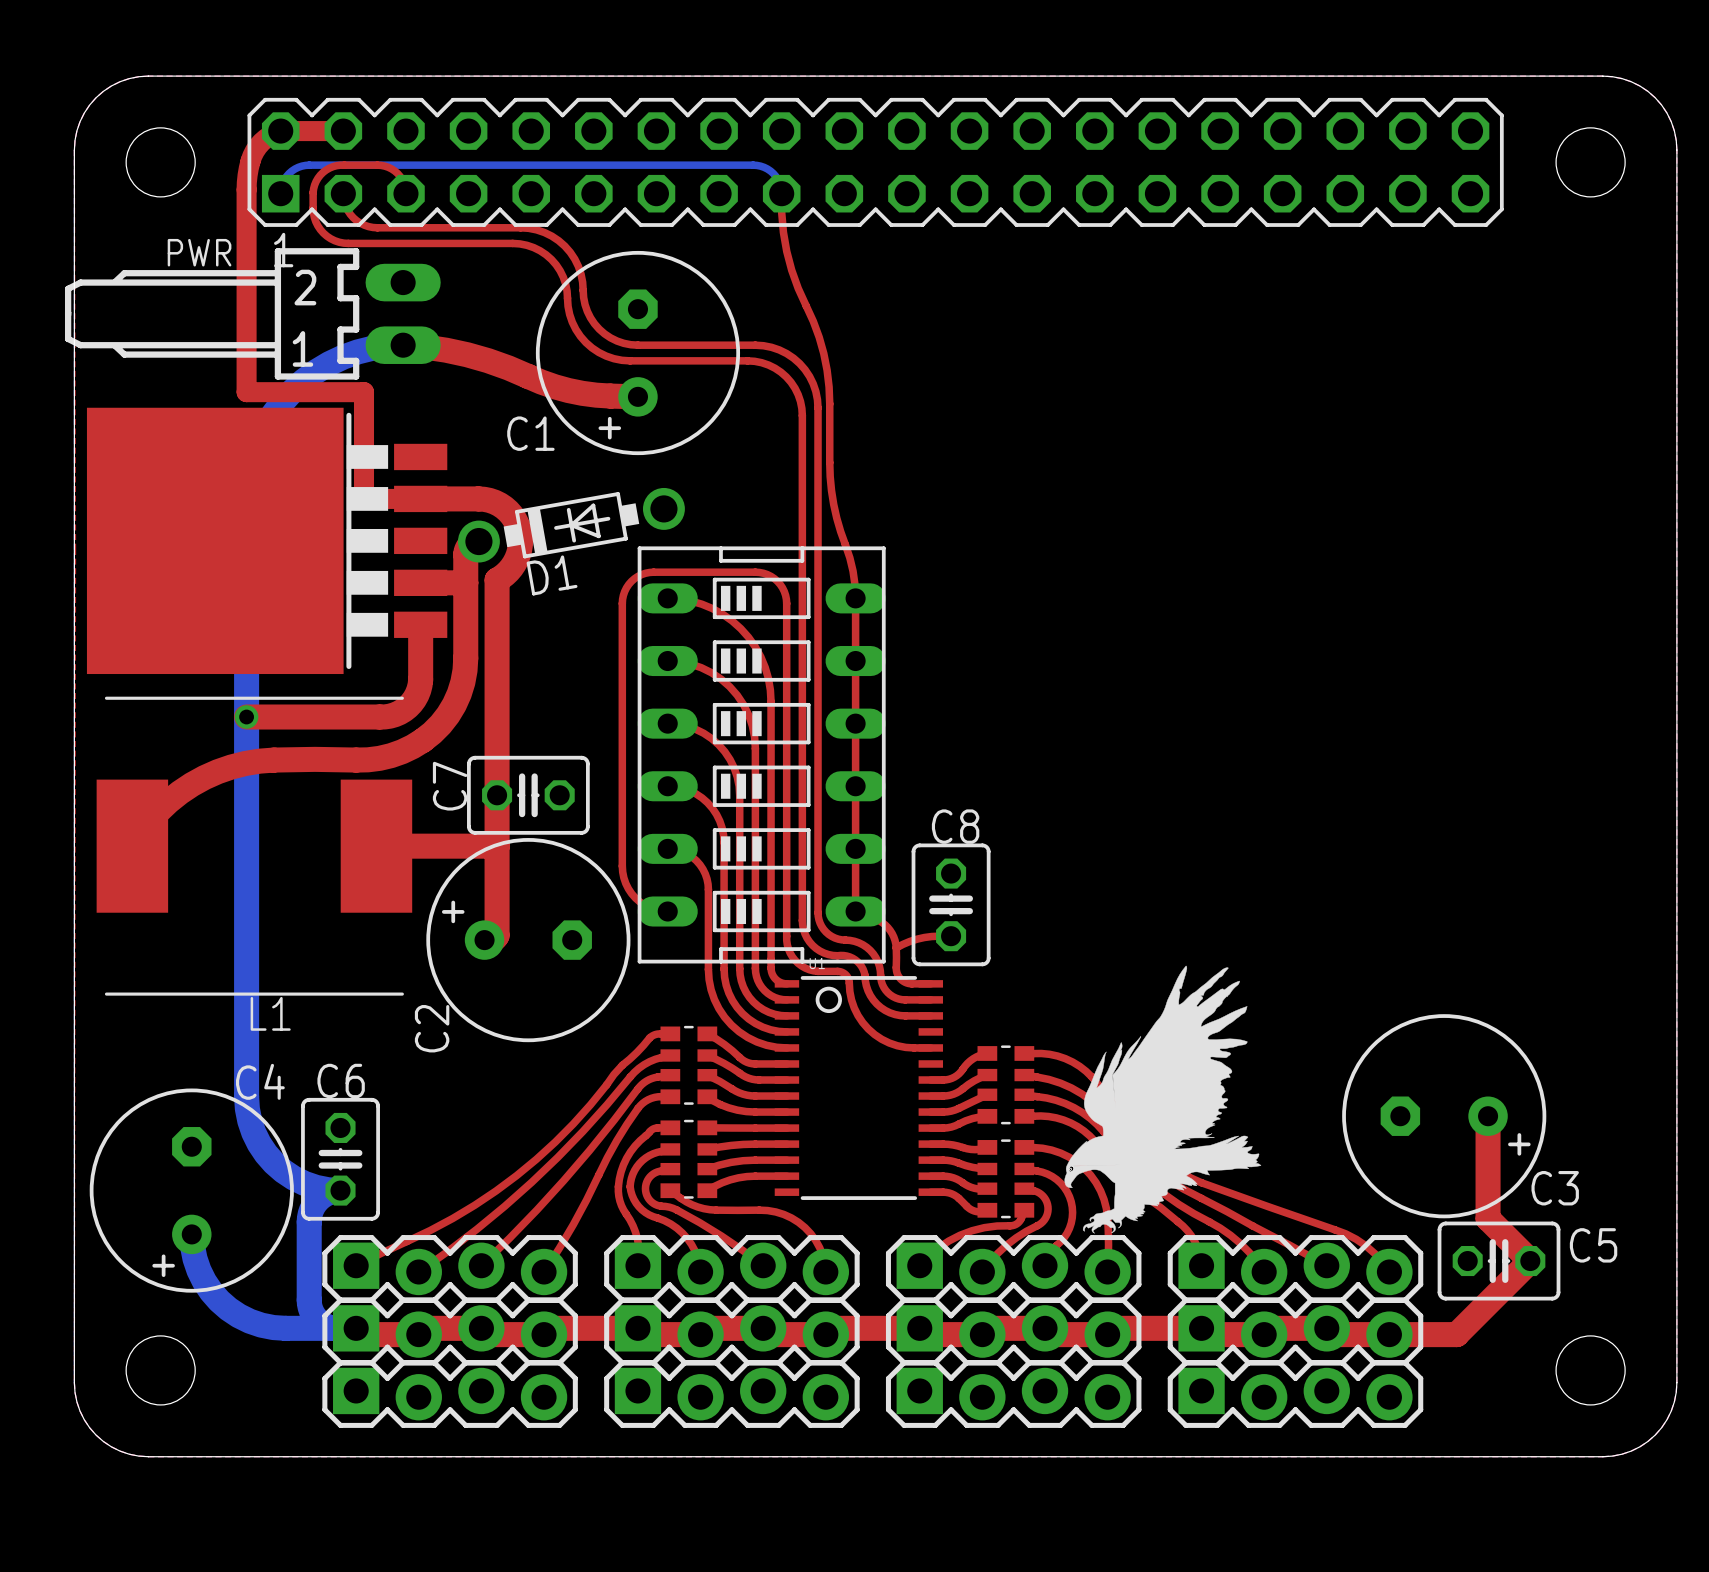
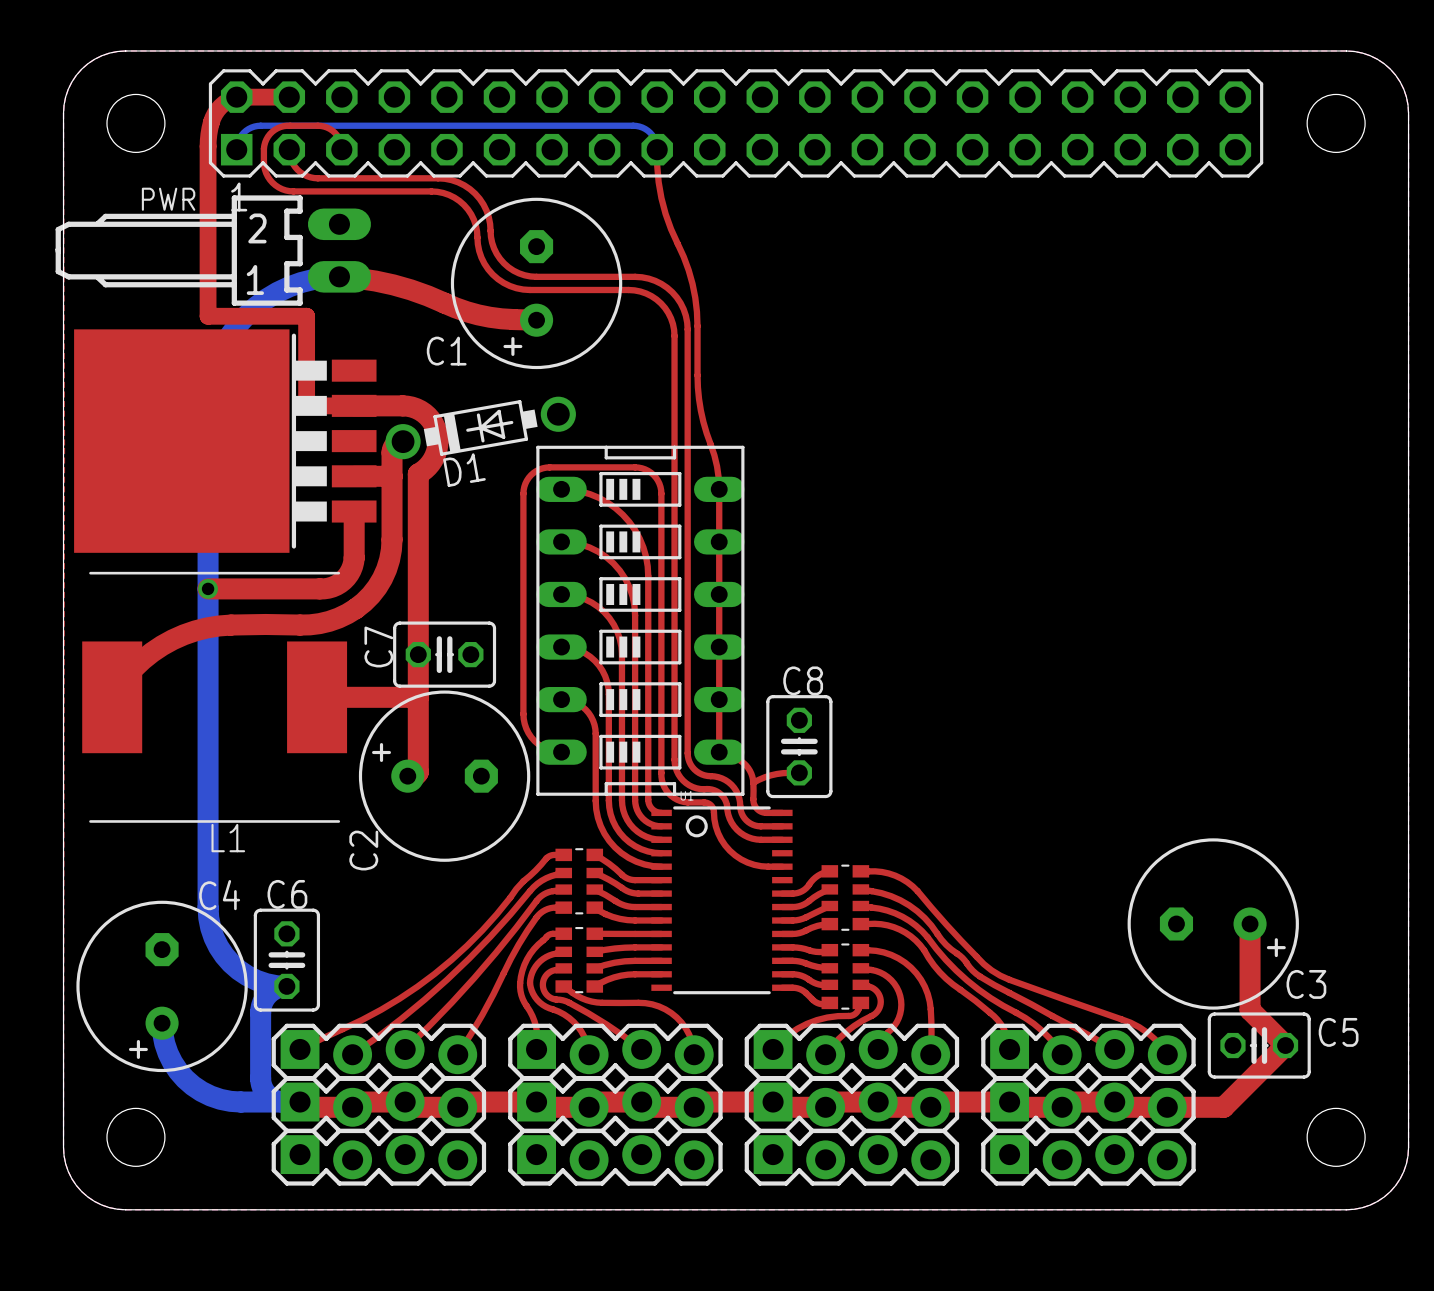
drawing: [1064, 965, 1262, 1234] -> none

